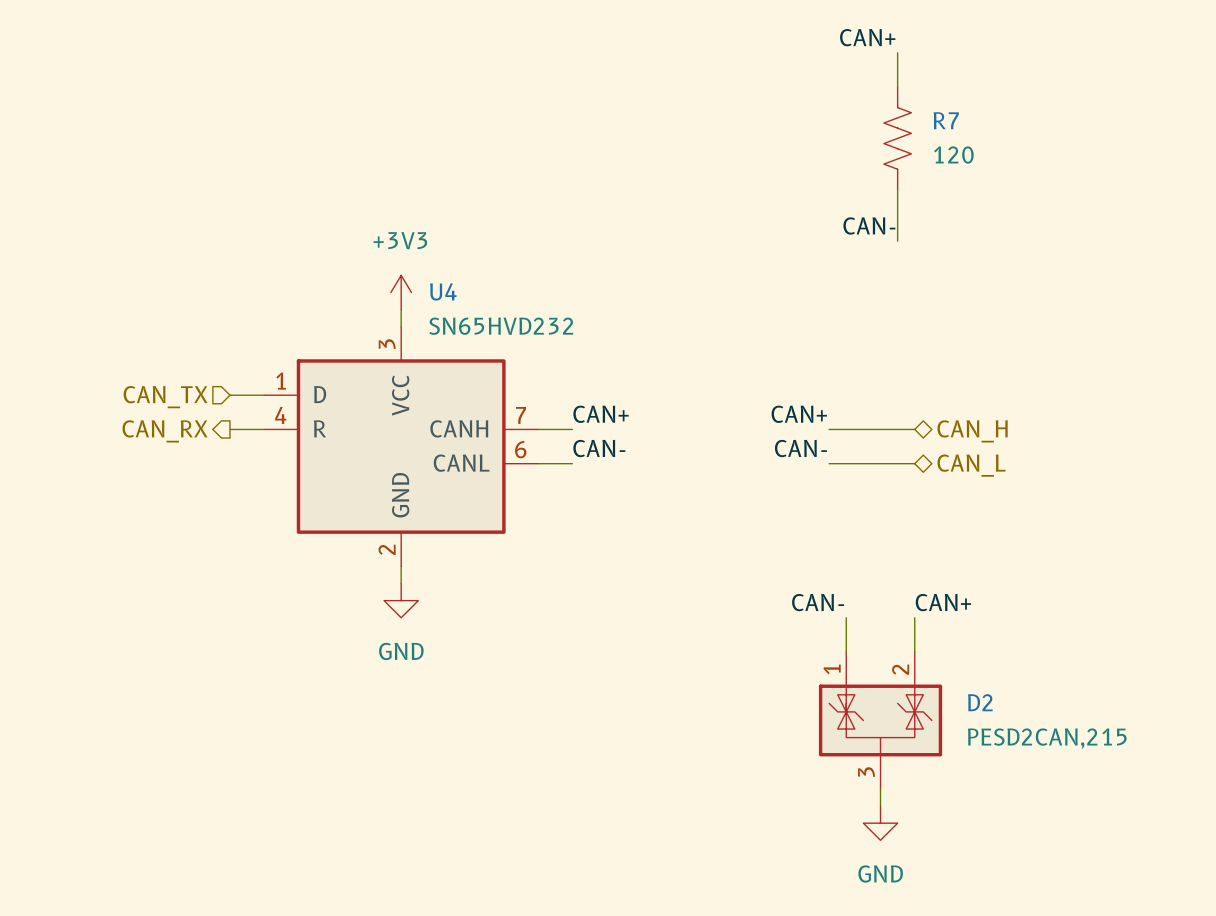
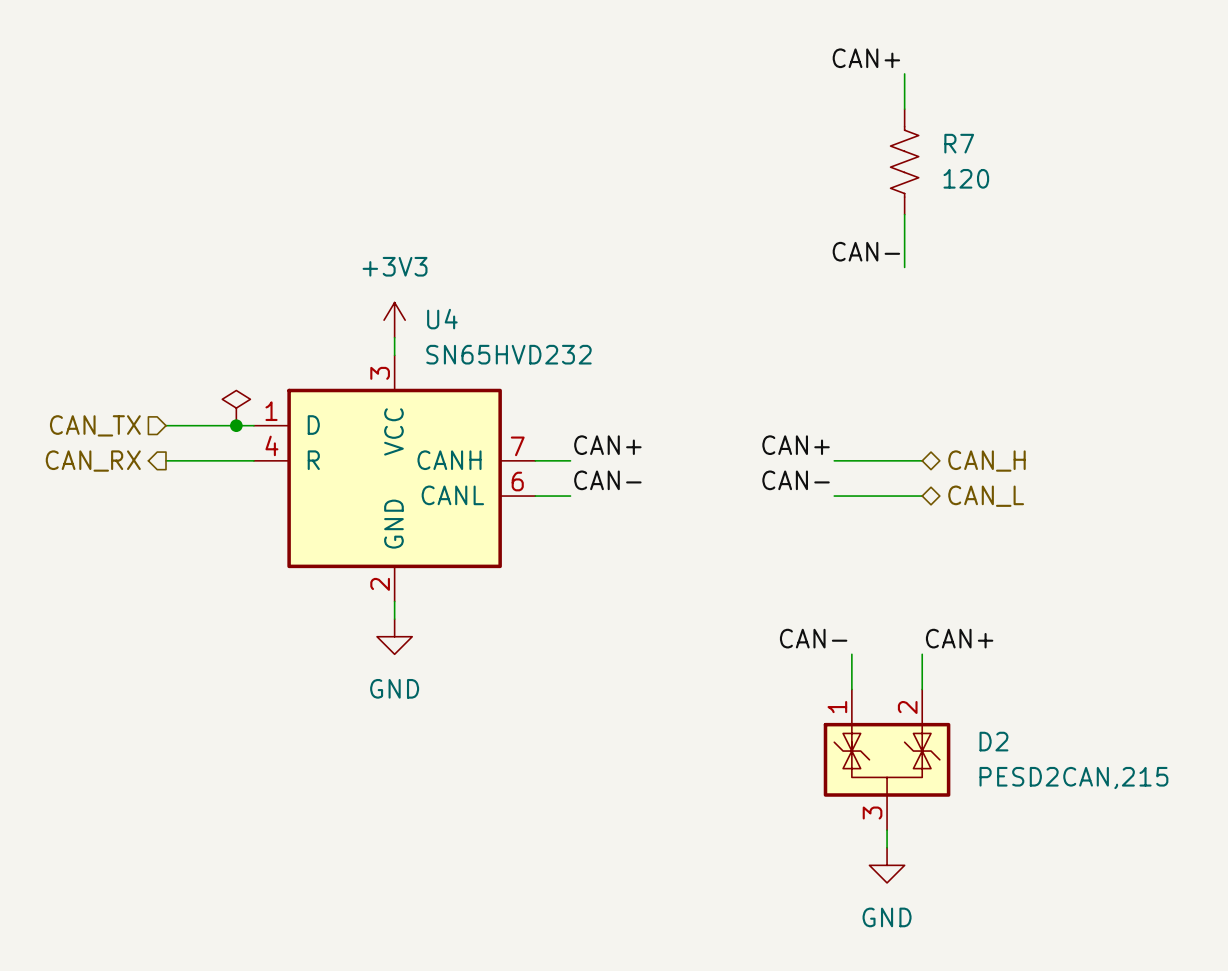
power symbol: none -> (236, 408)
wire: none -> (166, 425) (218, 425)
junction: none -> (236, 425)
hierarchical label position: CAN_TX (165, 397) -> CAN_TX (95, 425)
wire: none -> (166, 460) (218, 460)
hierarchical label position: CAN_RX (165, 431) -> CAN_RX (93, 461)

